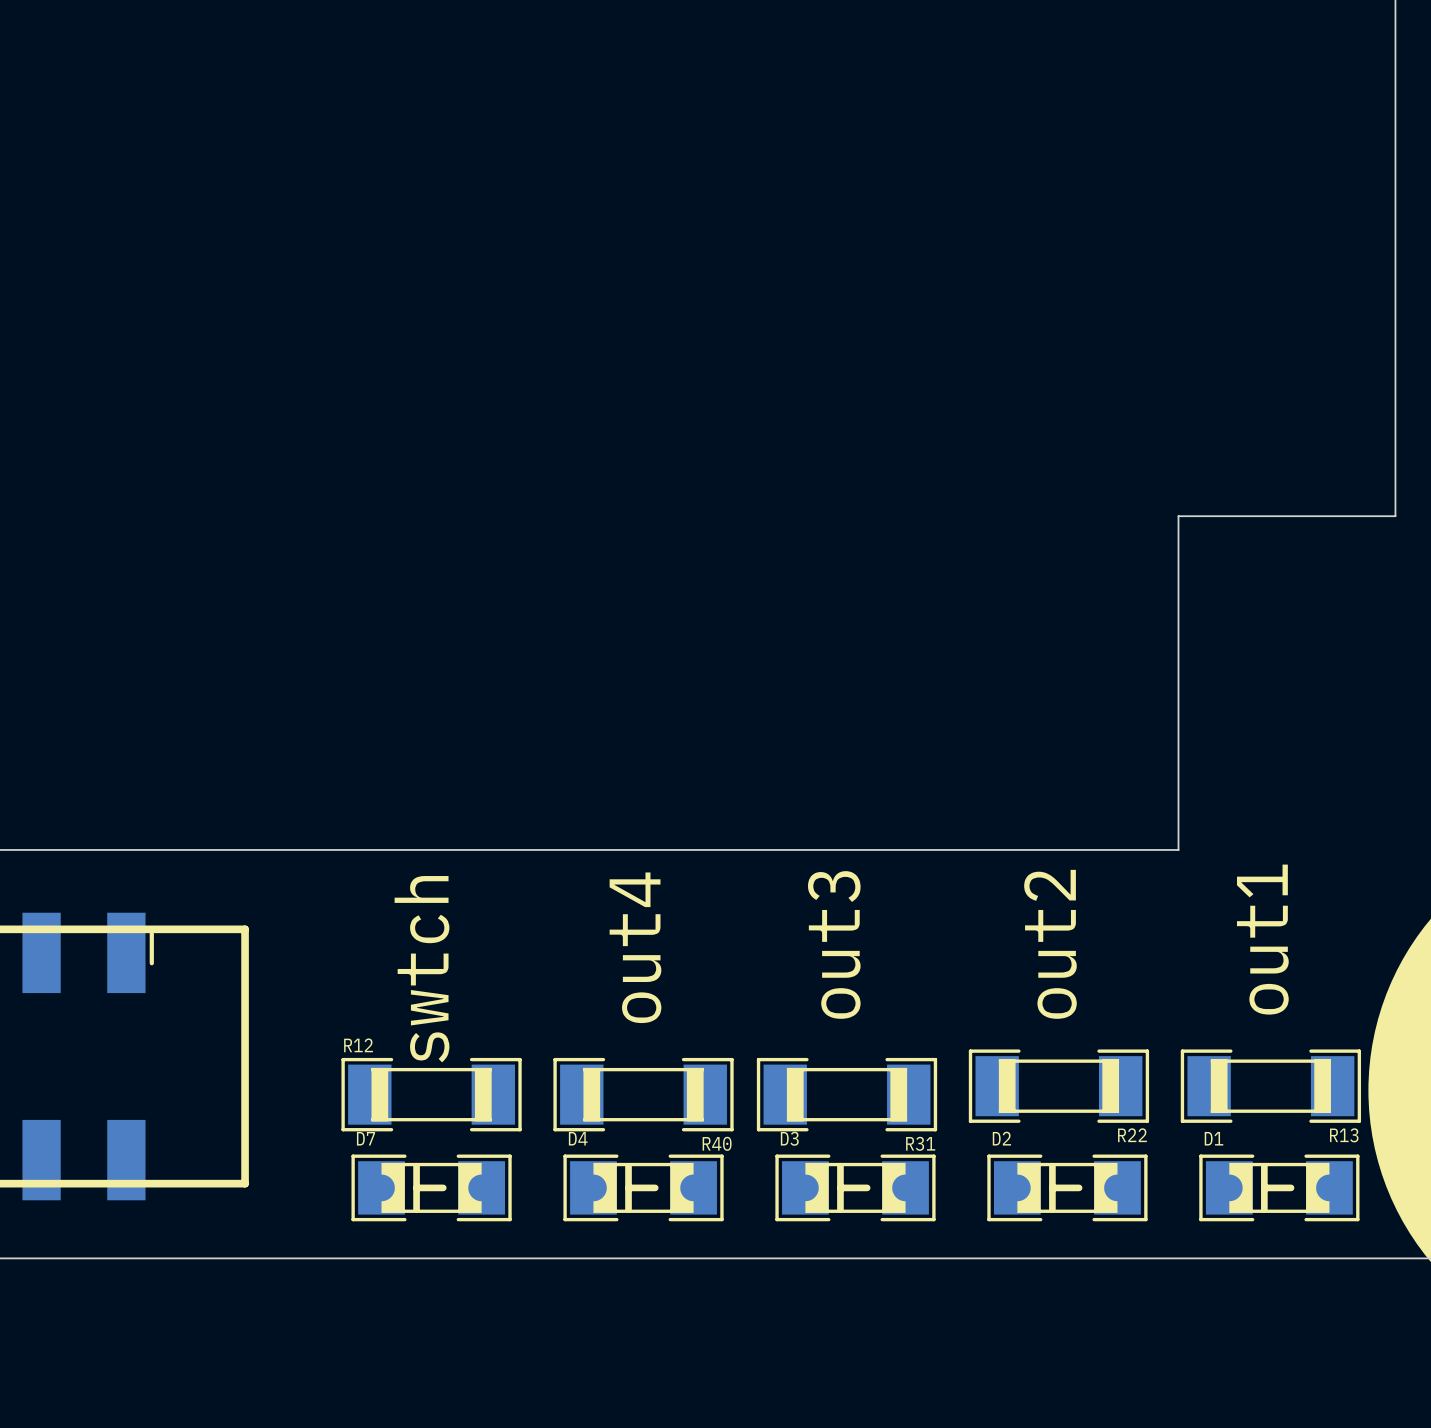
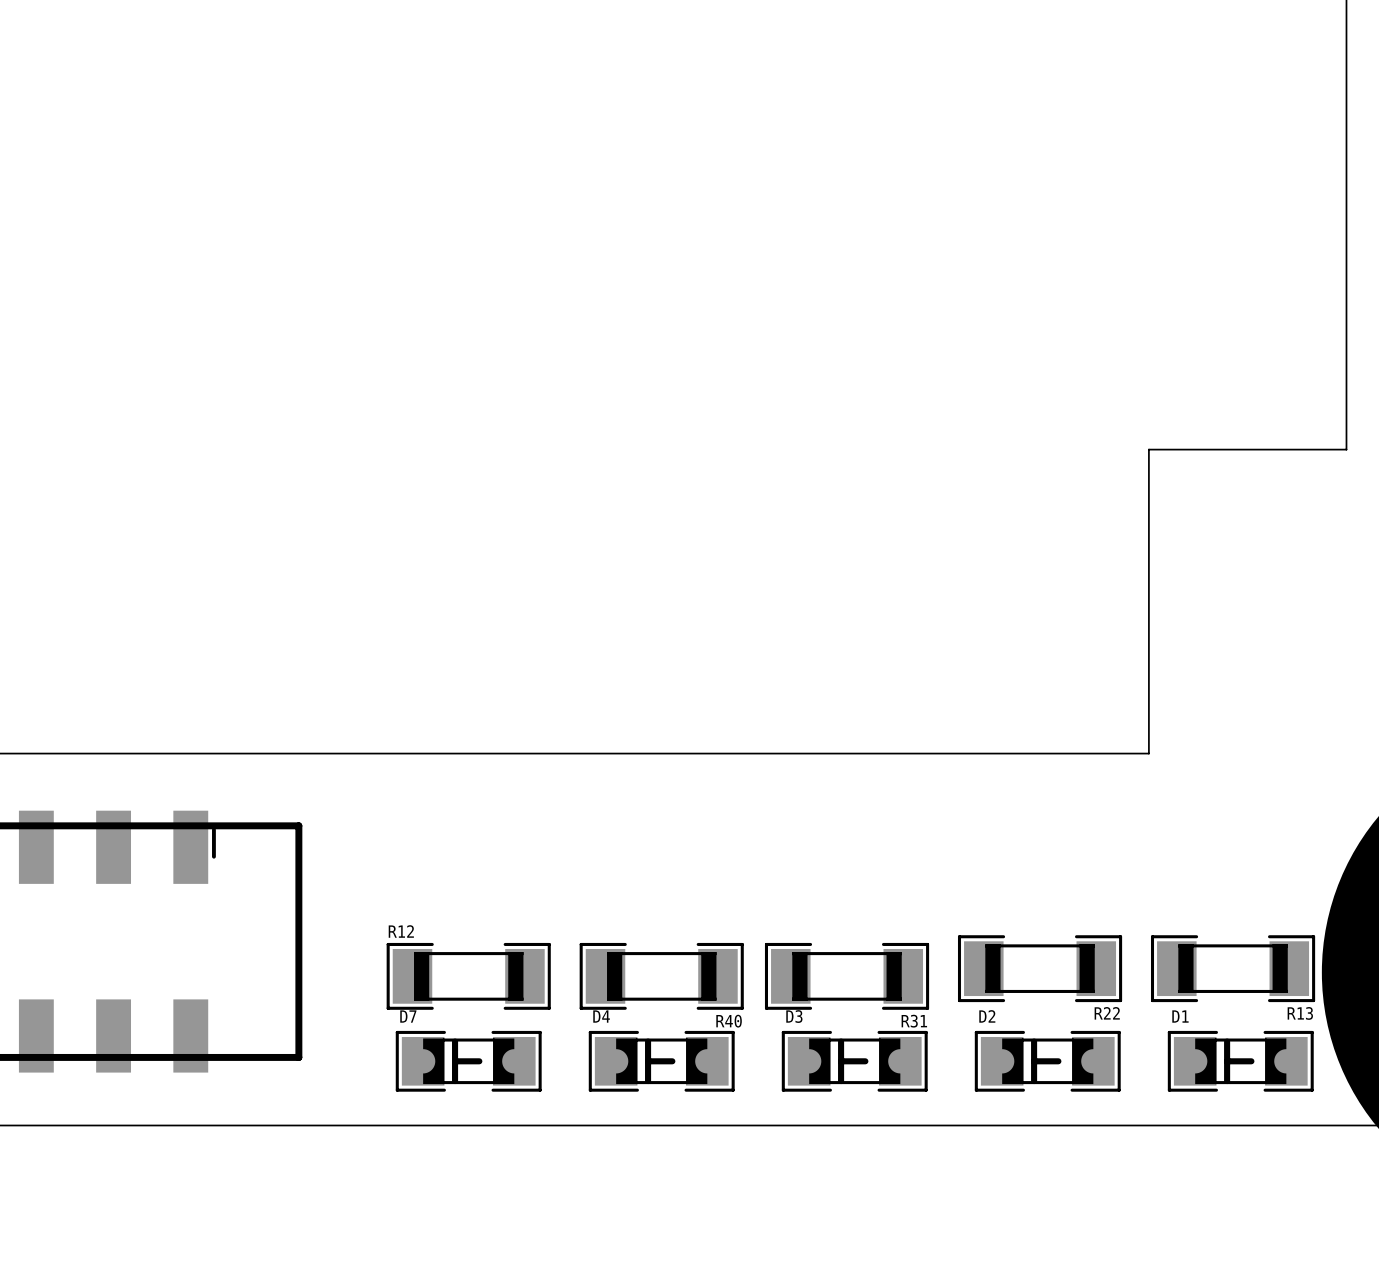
text: out1 (1262, 939) -> none
text: out3 (834, 944) -> none
text: out2 (1050, 944) -> none
text: out4 (635, 947) -> none
text: swtch (422, 969) -> none

